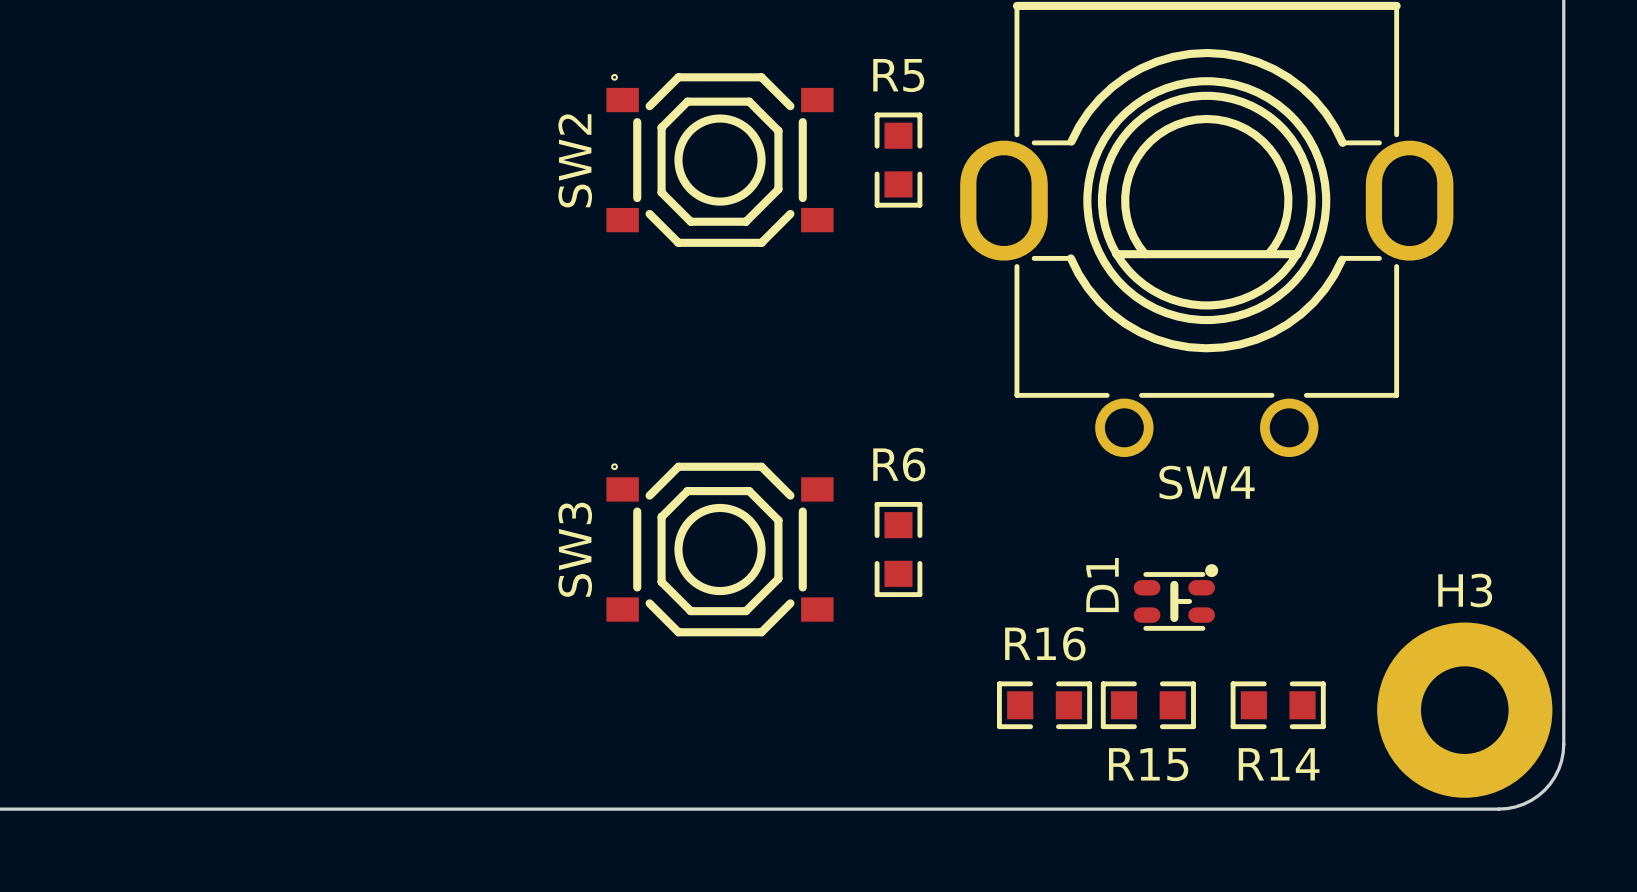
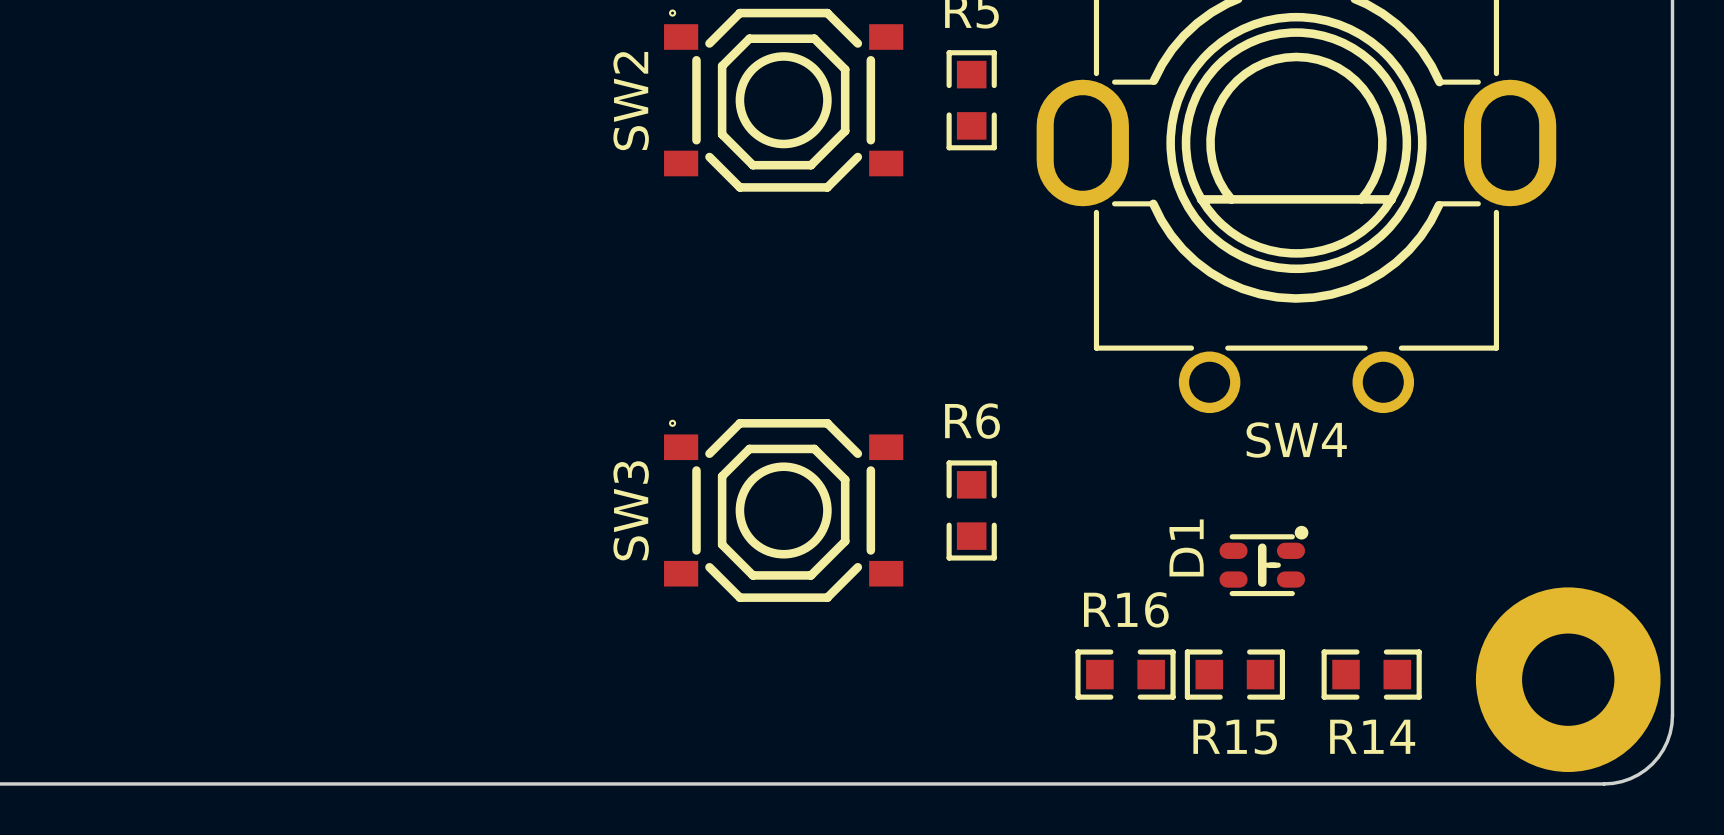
H3 name: H3 (1465, 590) -> none

